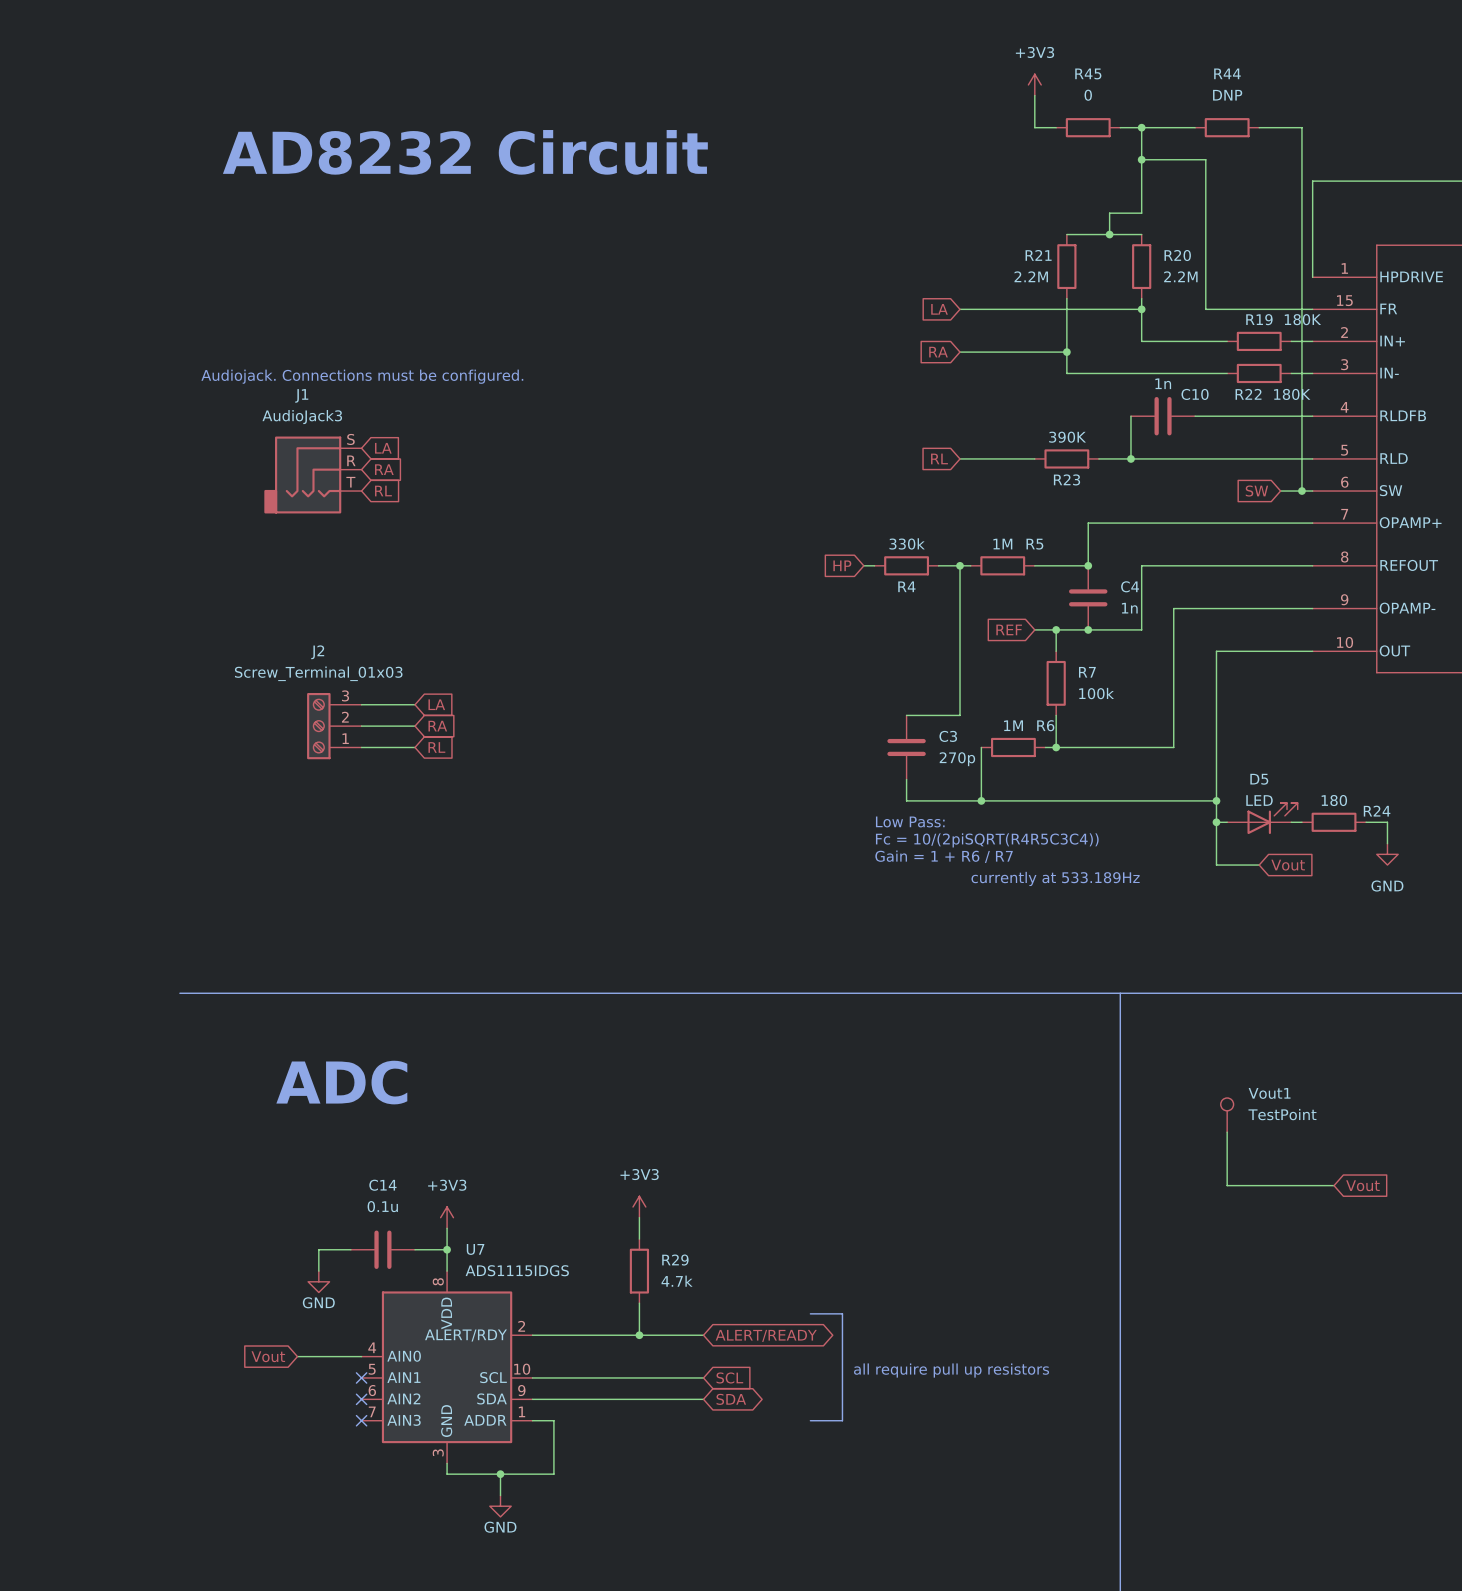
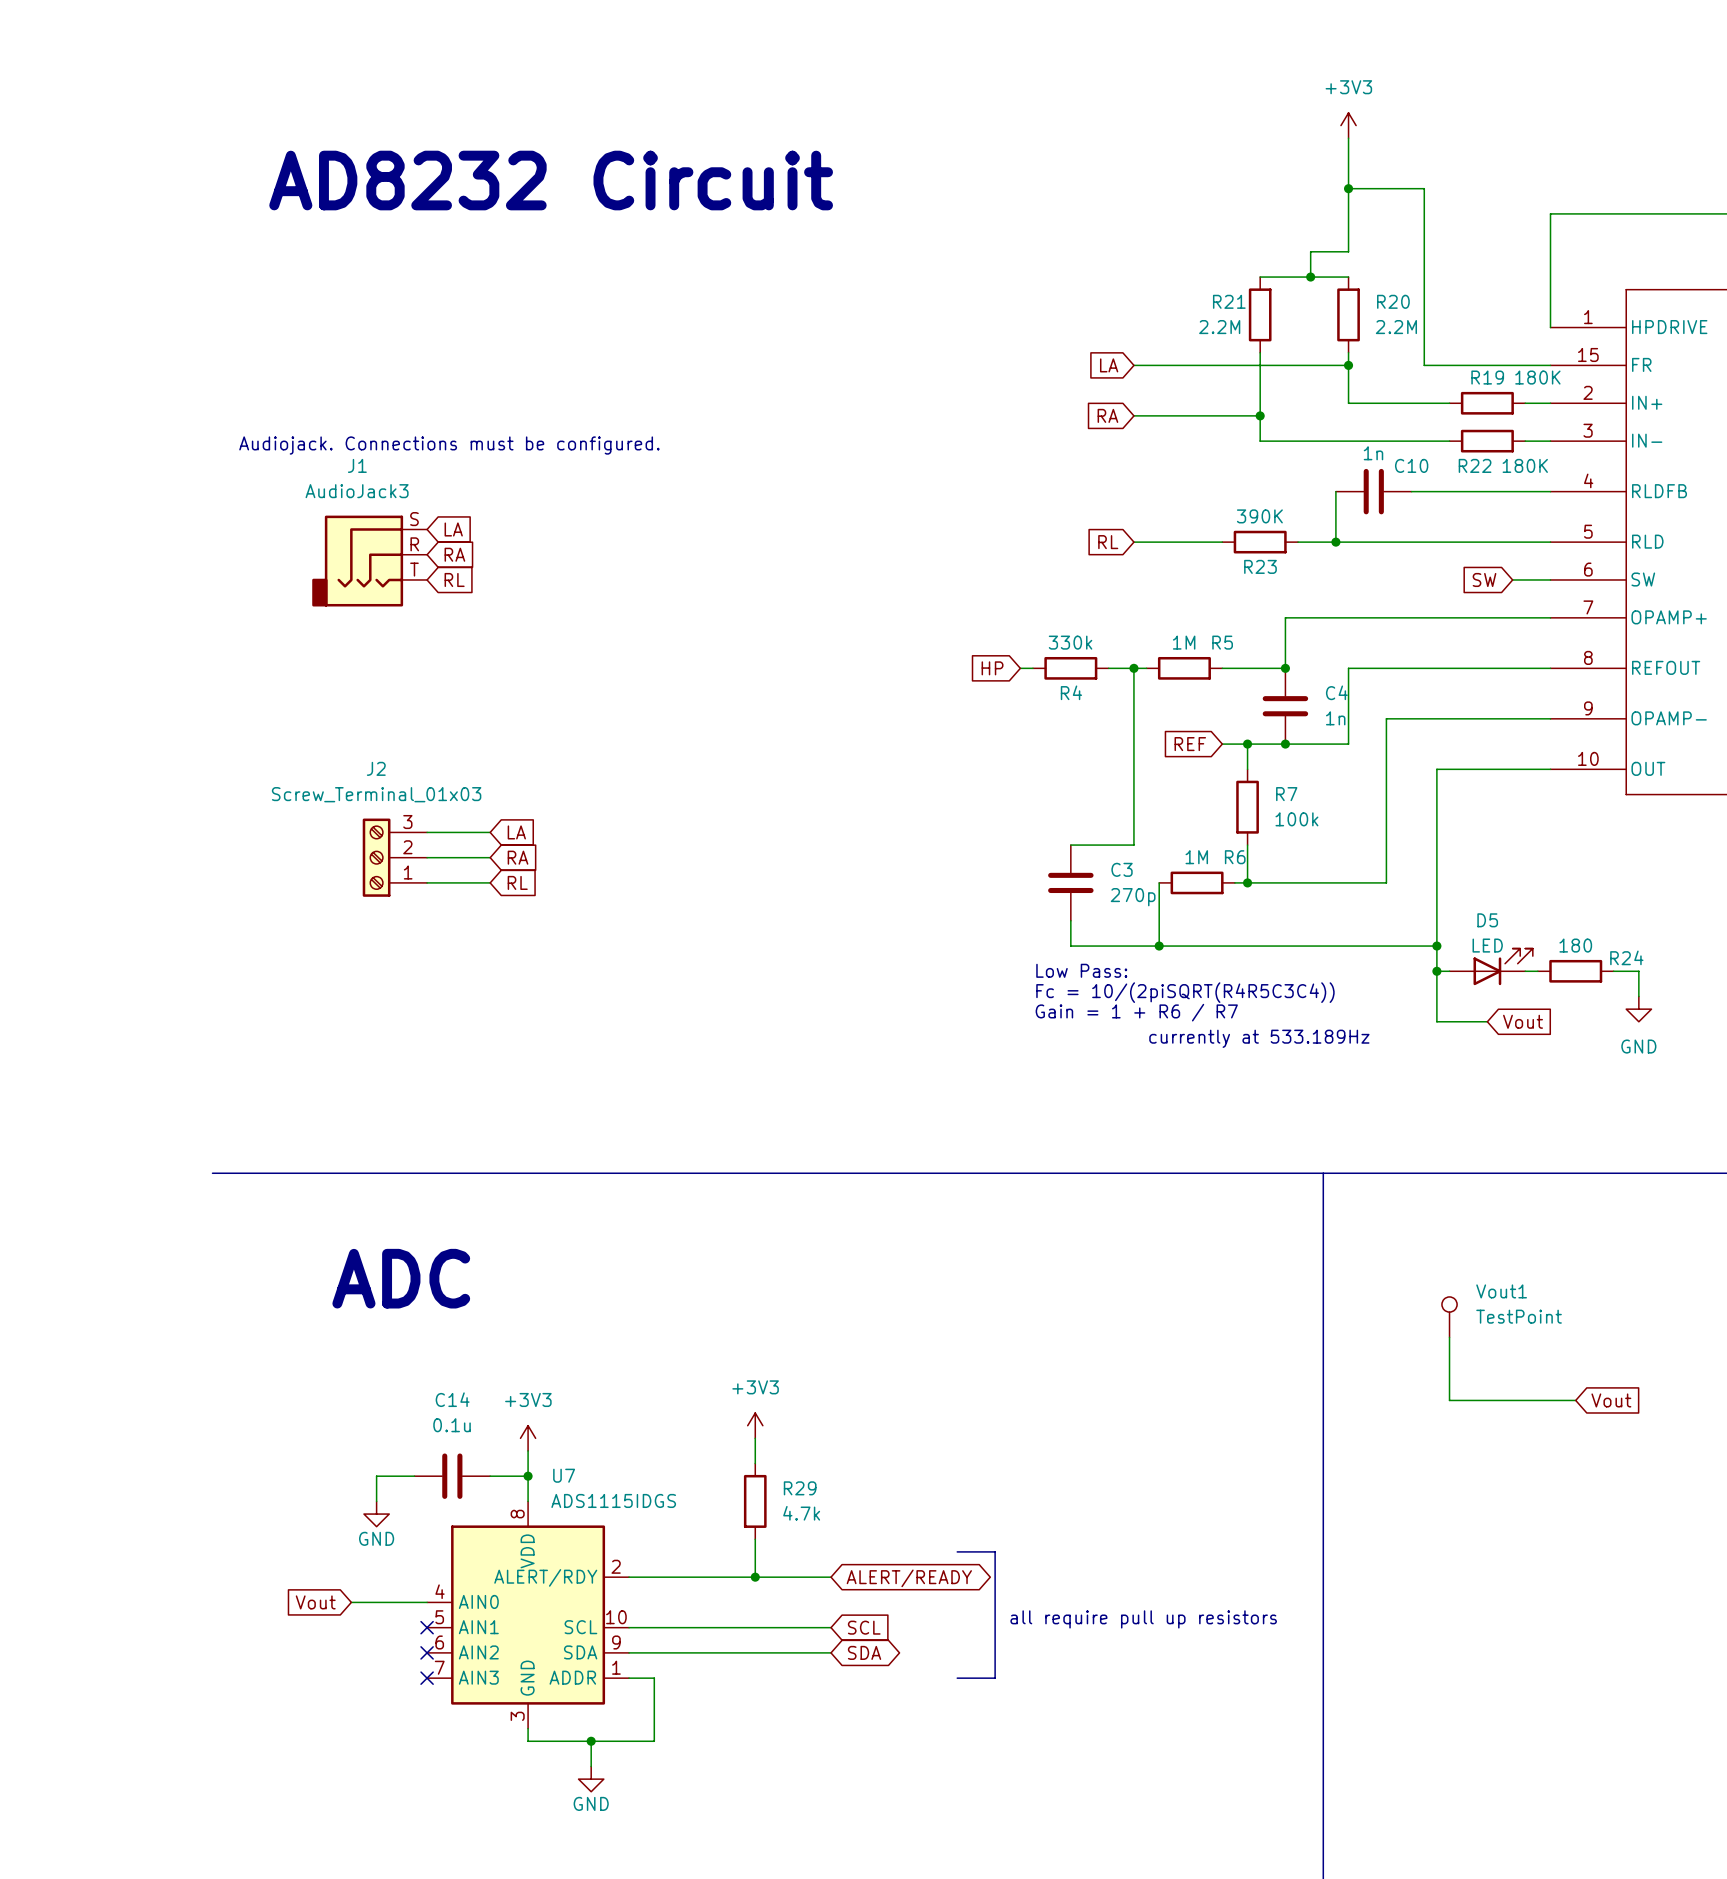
power symbol position: +3V3 (1034, 84) -> +3V3 (1348, 125)
wire: (1034, 95) (1034, 127) (1056, 127) -> none
wire: none -> (1348, 138) (1348, 150)
R45: 0 (1088, 127) -> none
wire: (1120, 127) (1195, 127) -> none
junction: (1141, 127) -> none
R44: DNP (1227, 127) -> none
wire: (1259, 127) (1301, 127) (1301, 491) -> none
junction: (1301, 491) -> none

